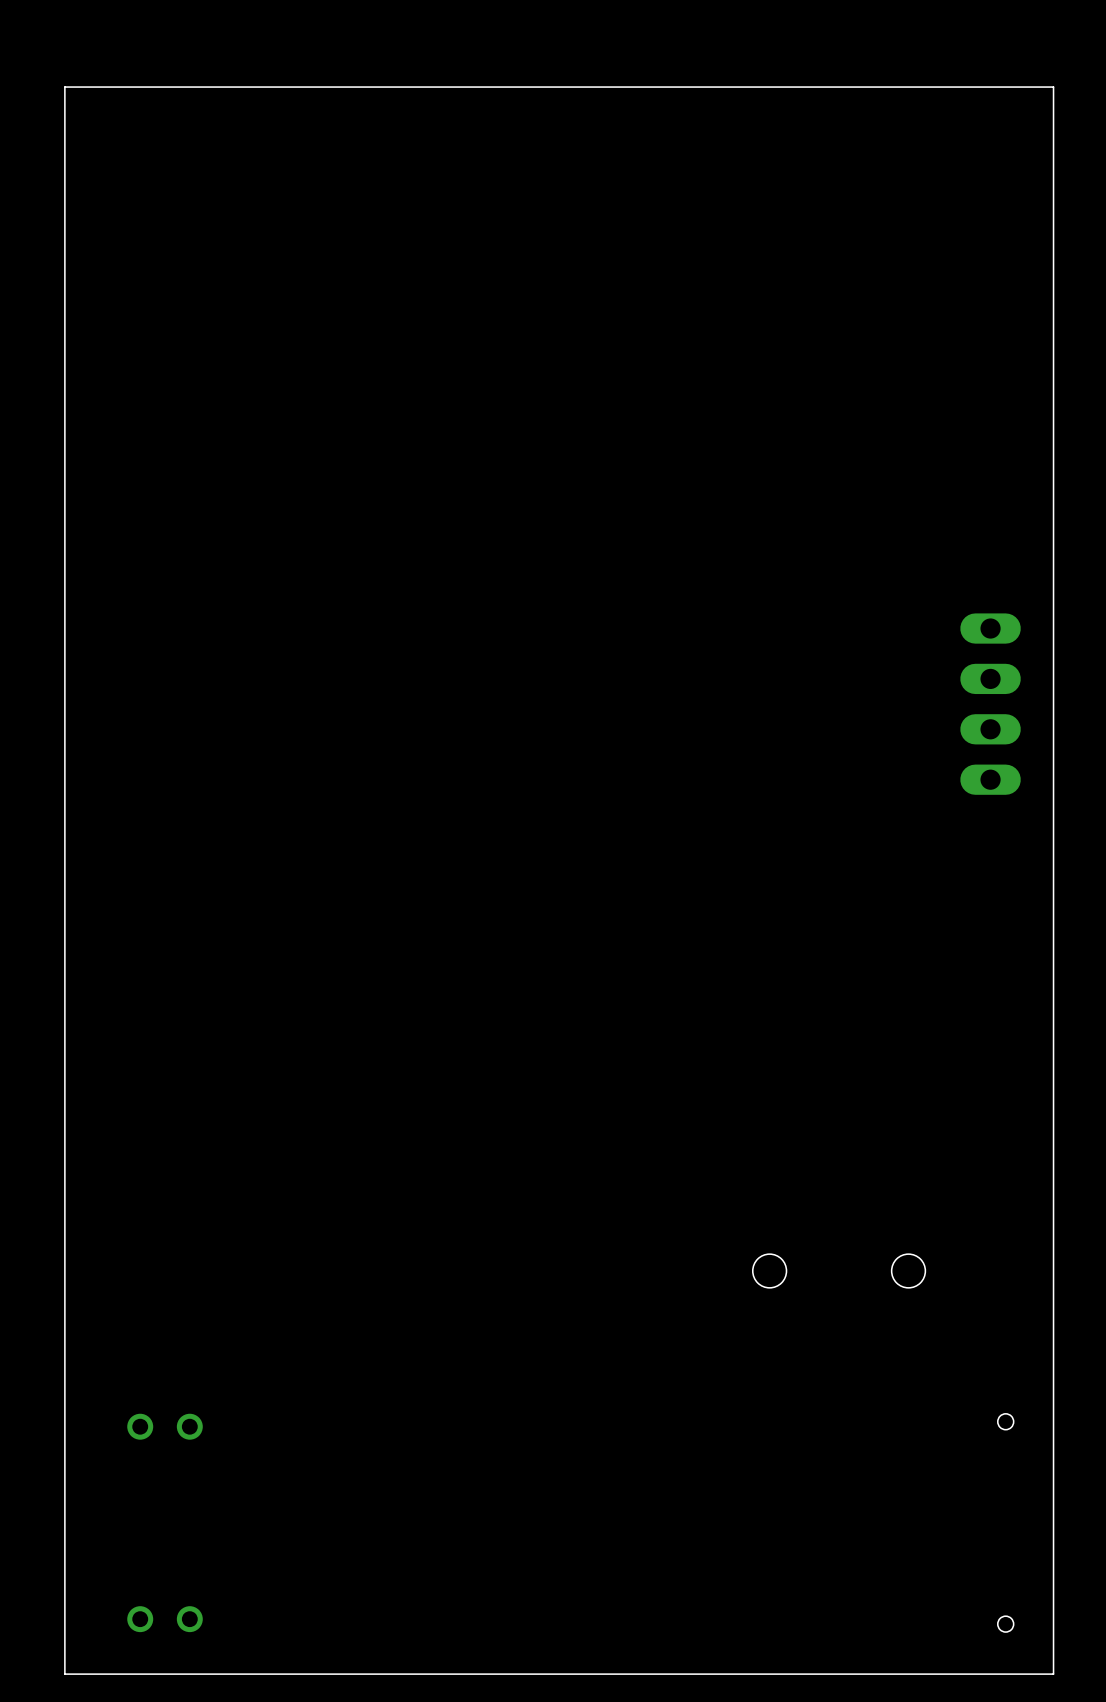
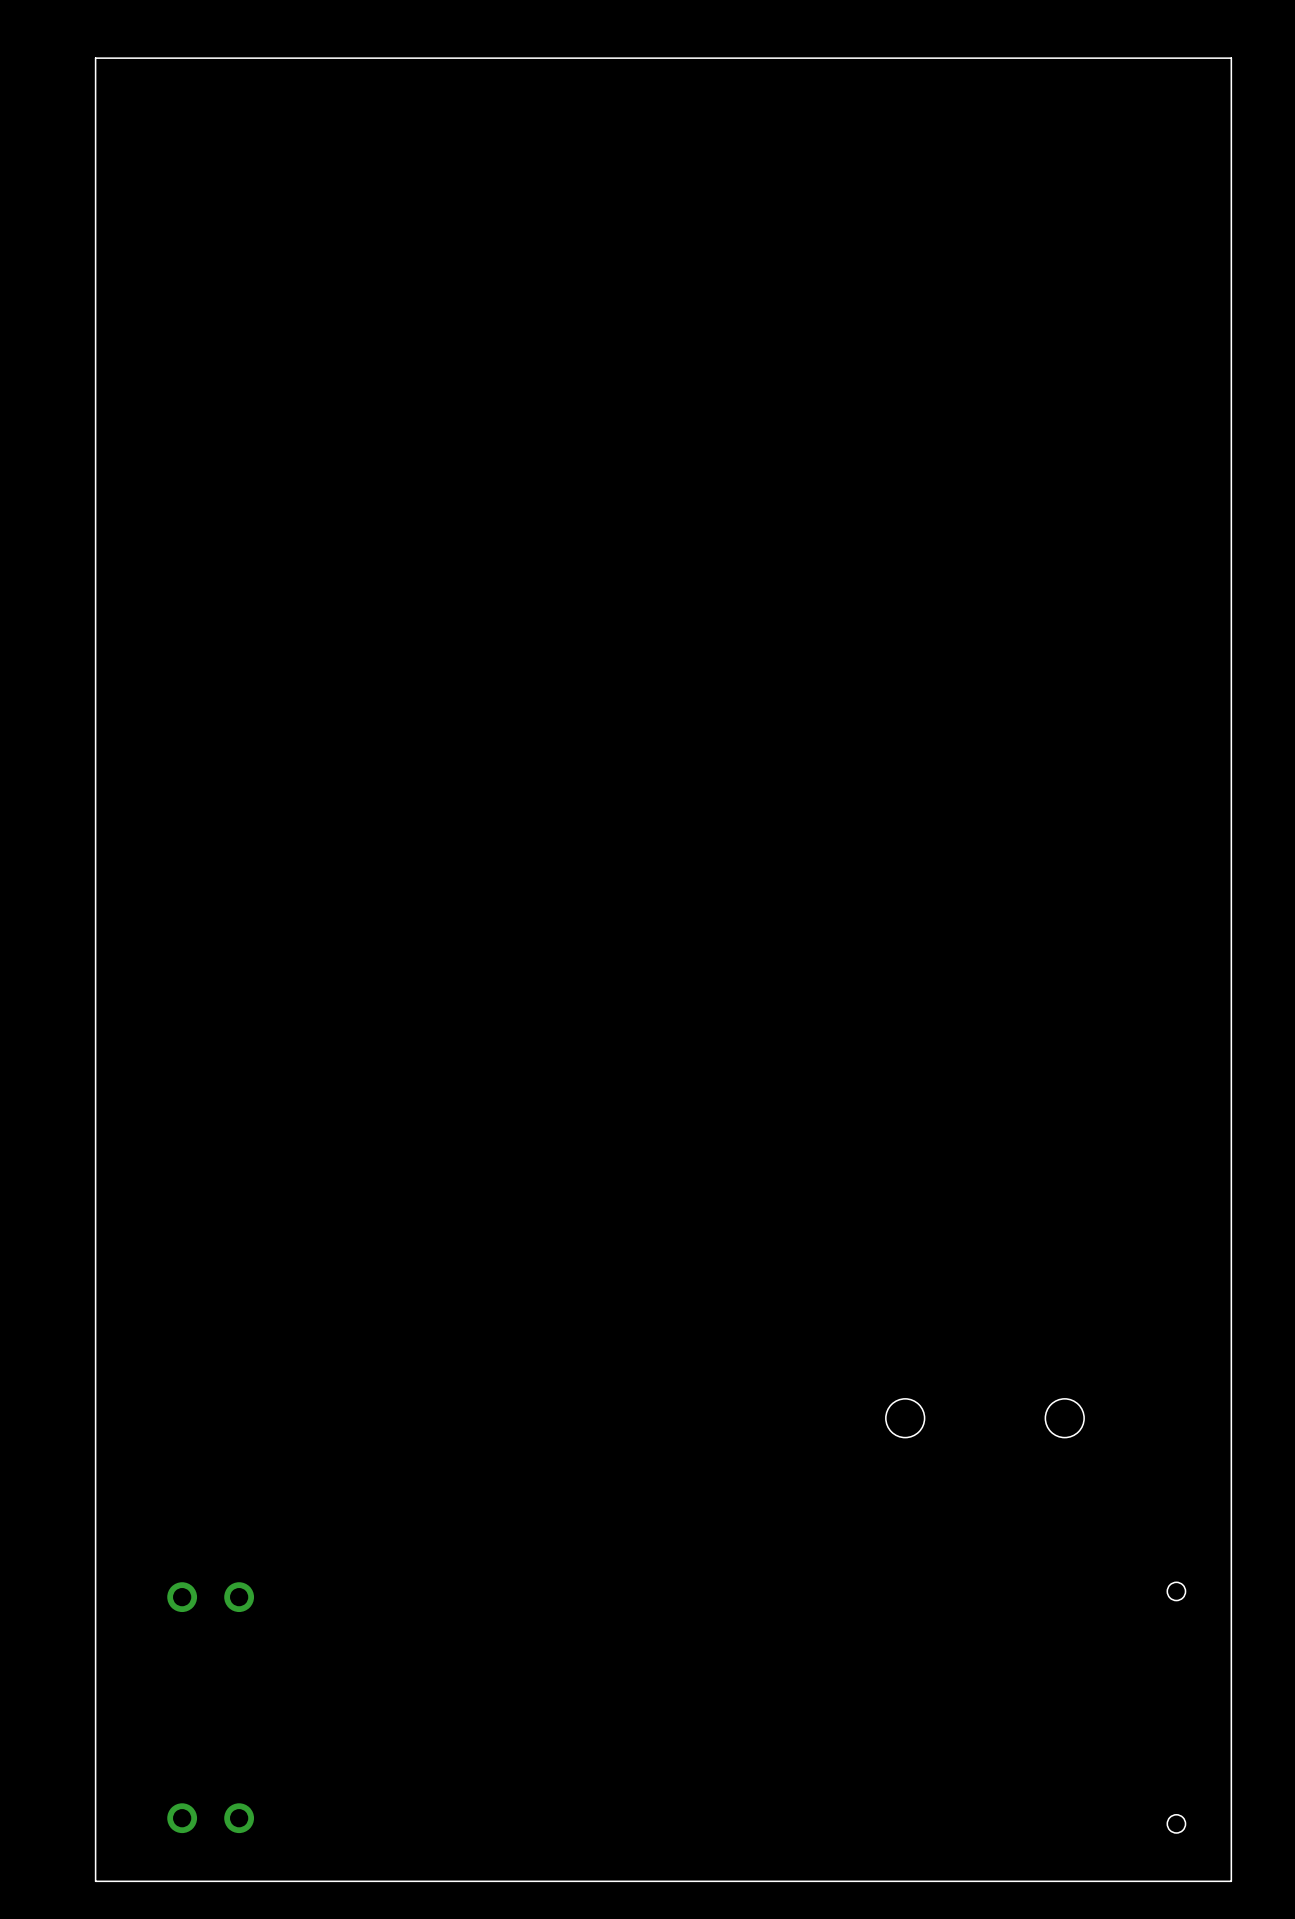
part: (990, 704) -> none

